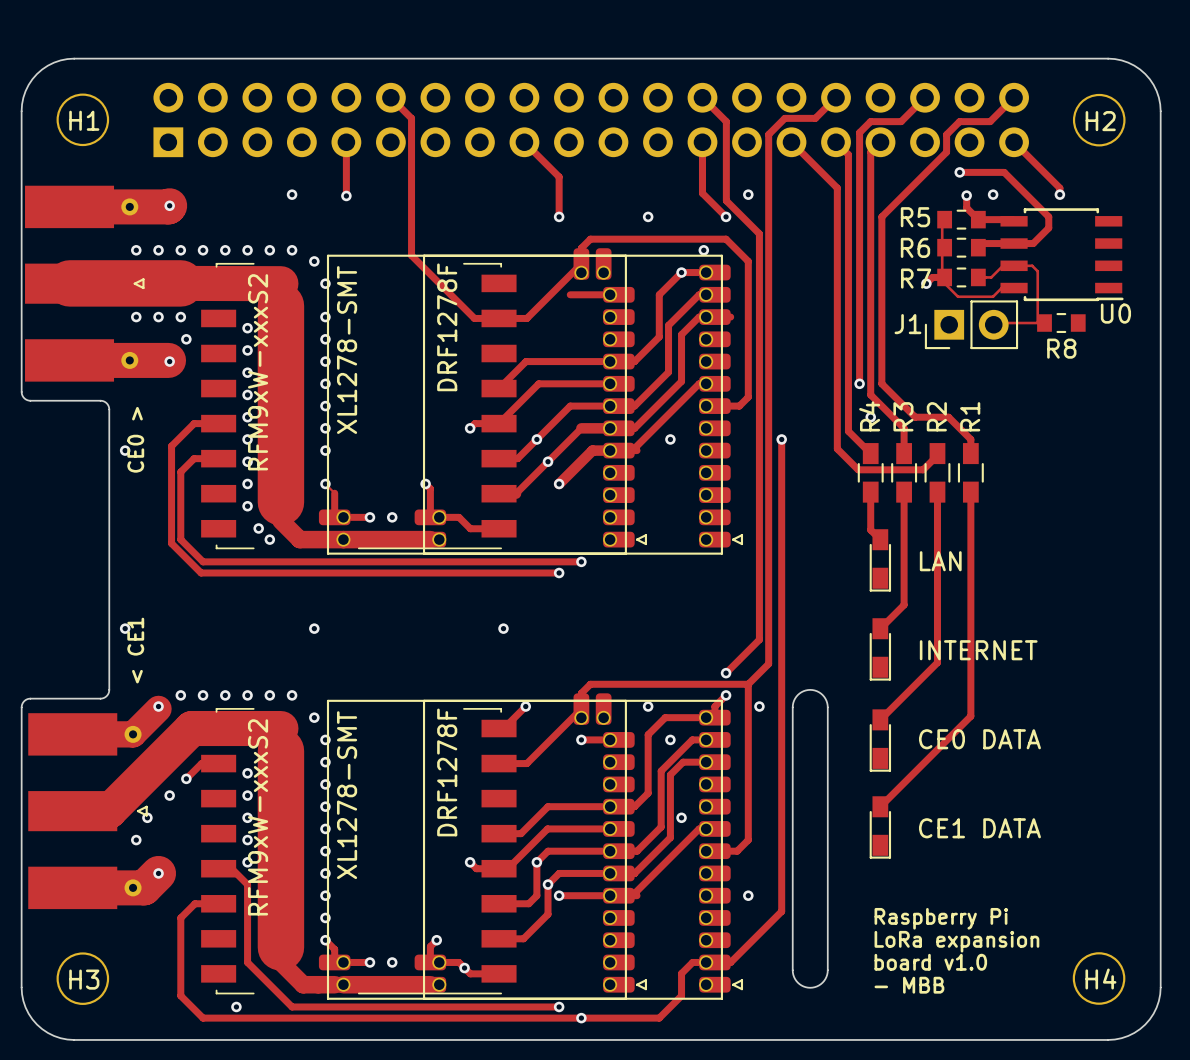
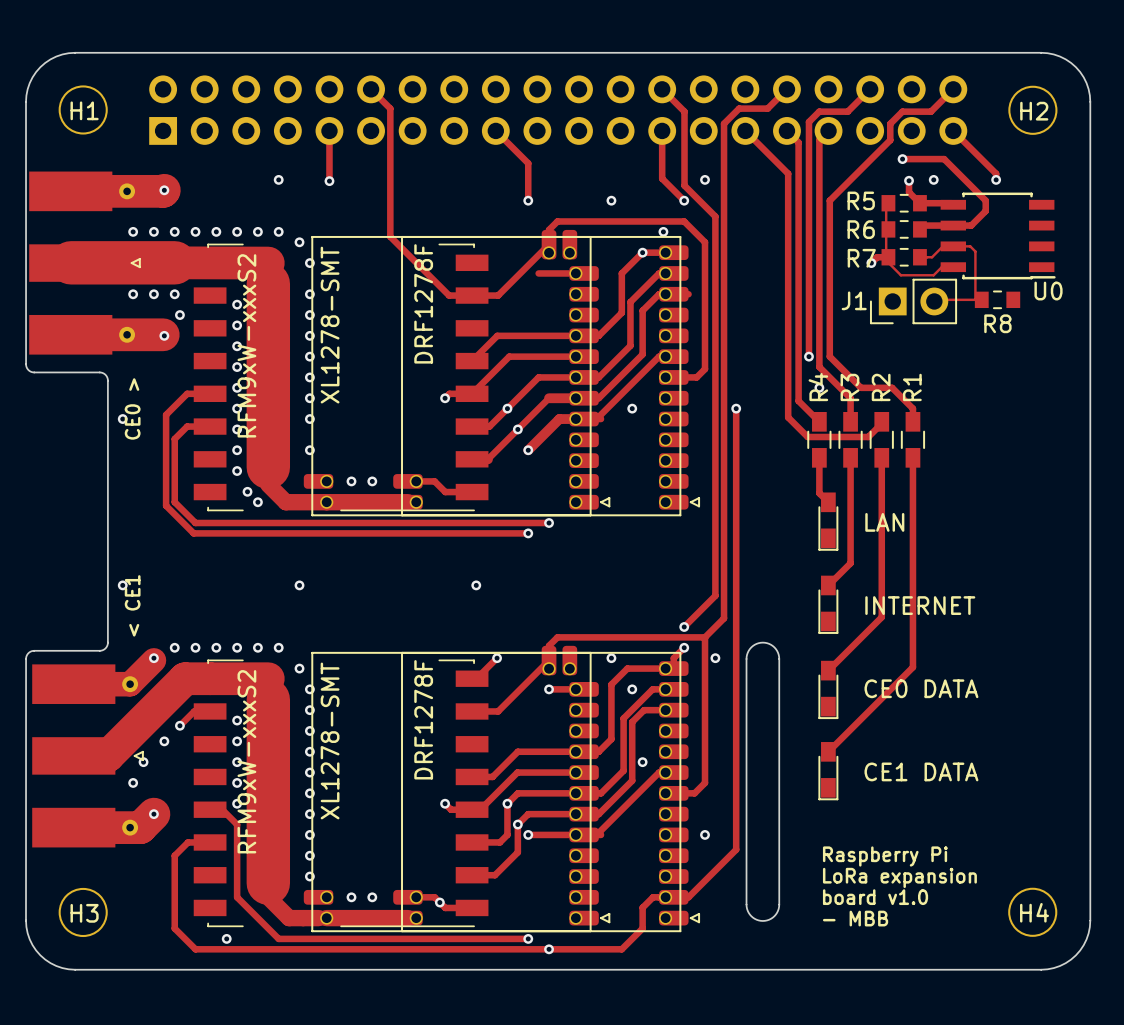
track: (325, 483) (334, 493) (334, 517) (369, 517) -> none
track: (425, 483) (430, 488) (430, 517) -> none
via: (425, 483) -> none
track: (325, 940) (334, 949) (334, 962) (369, 962) -> none
track: (436, 940) (430, 946) (430, 962) -> none
via: (436, 940) -> none

